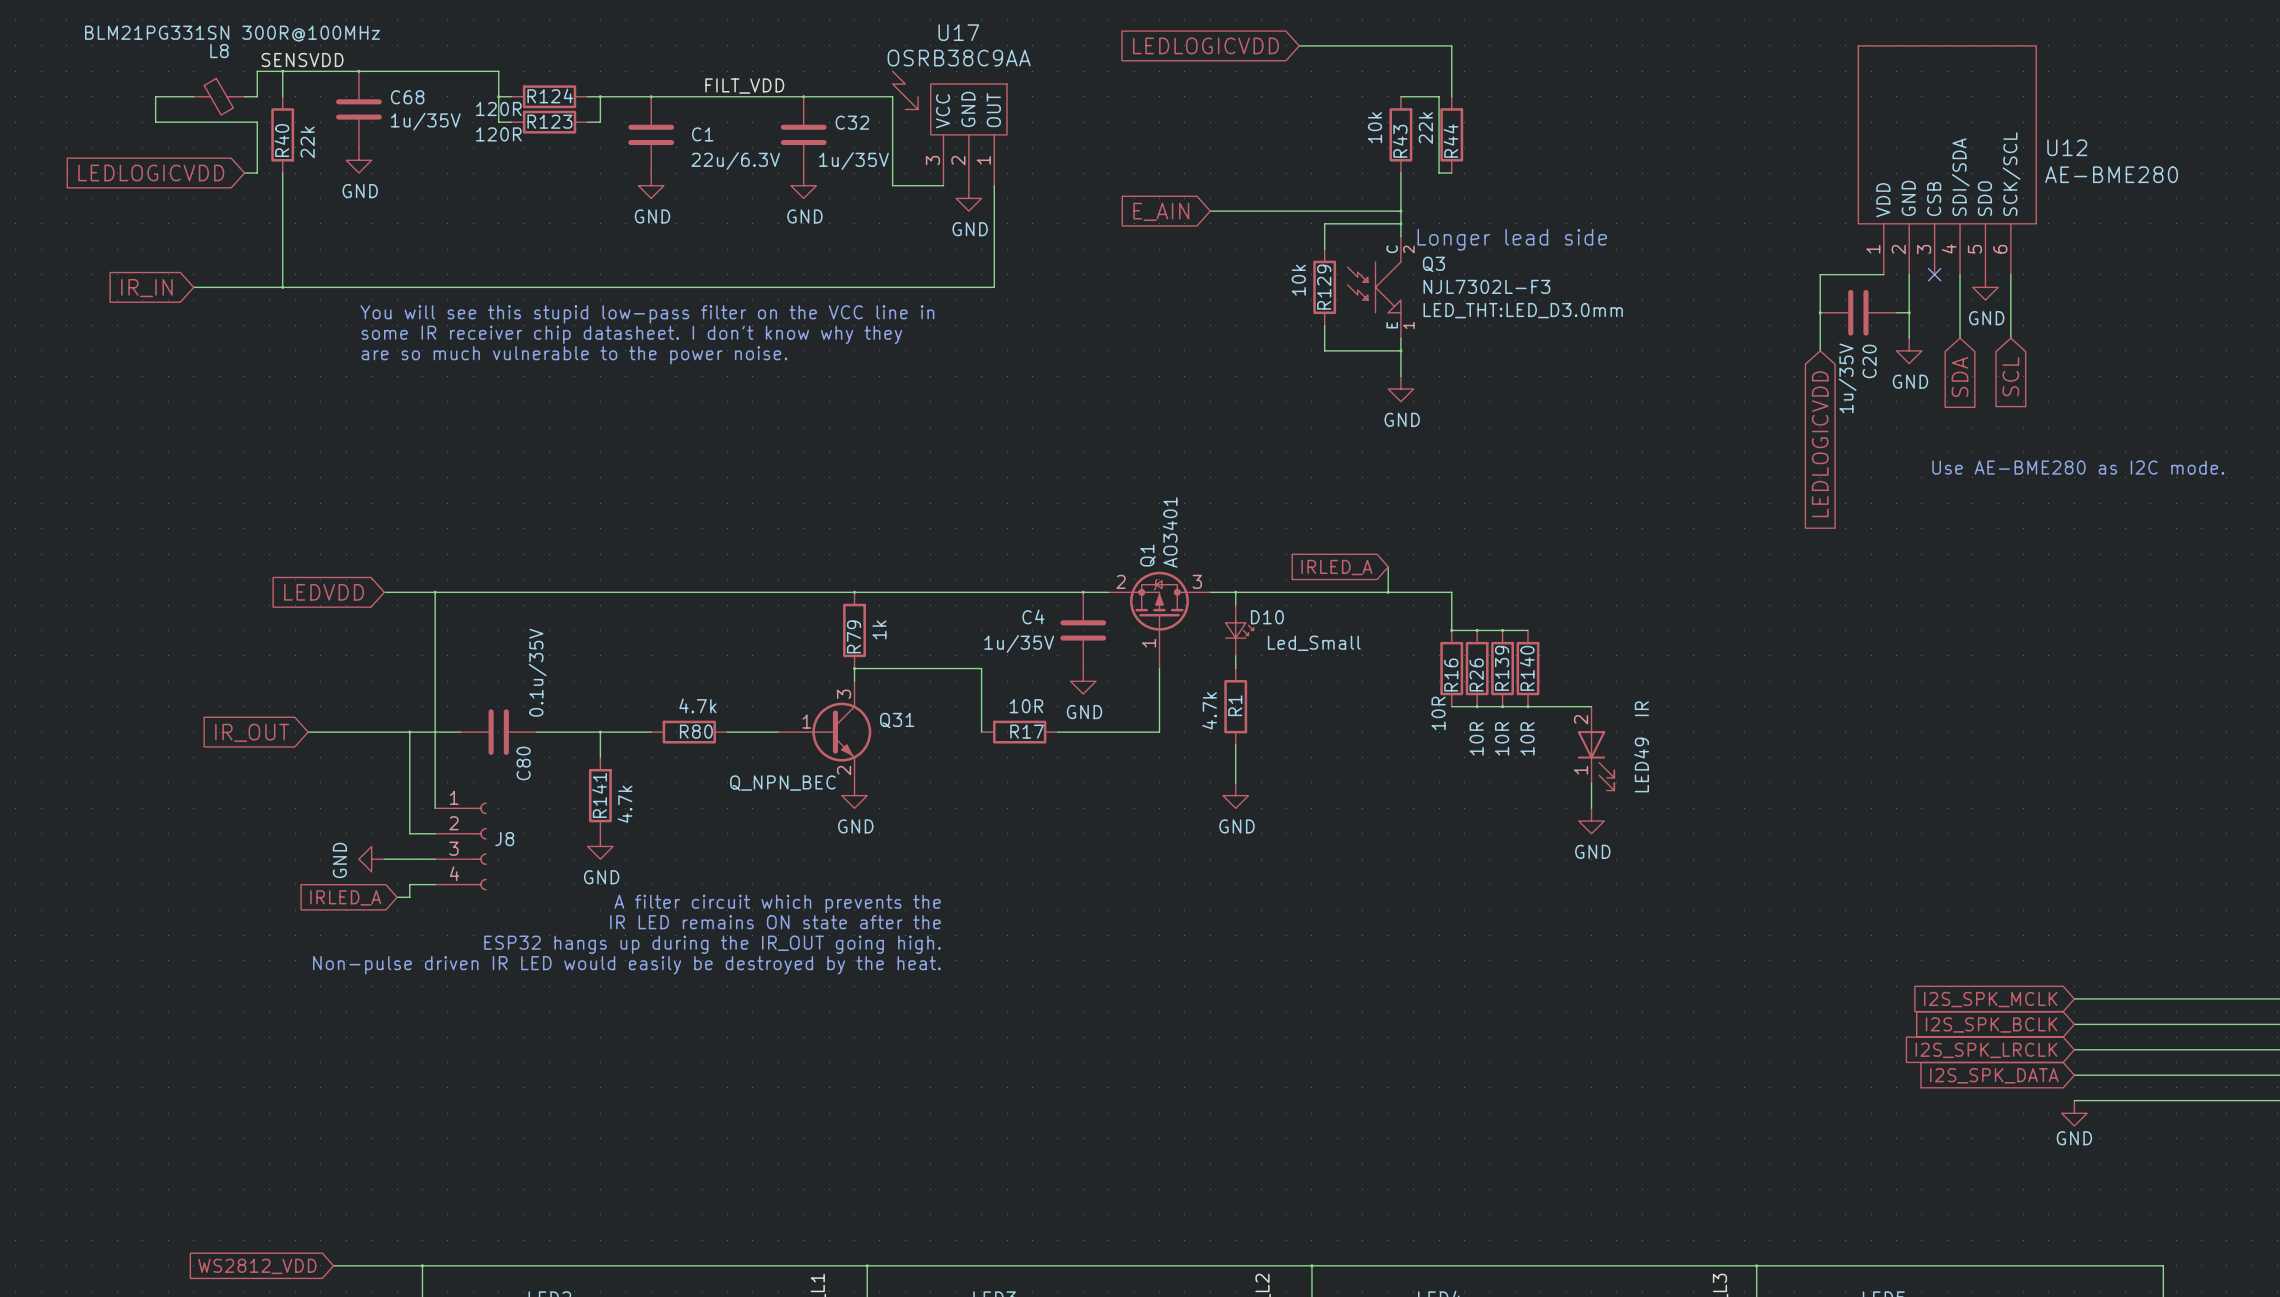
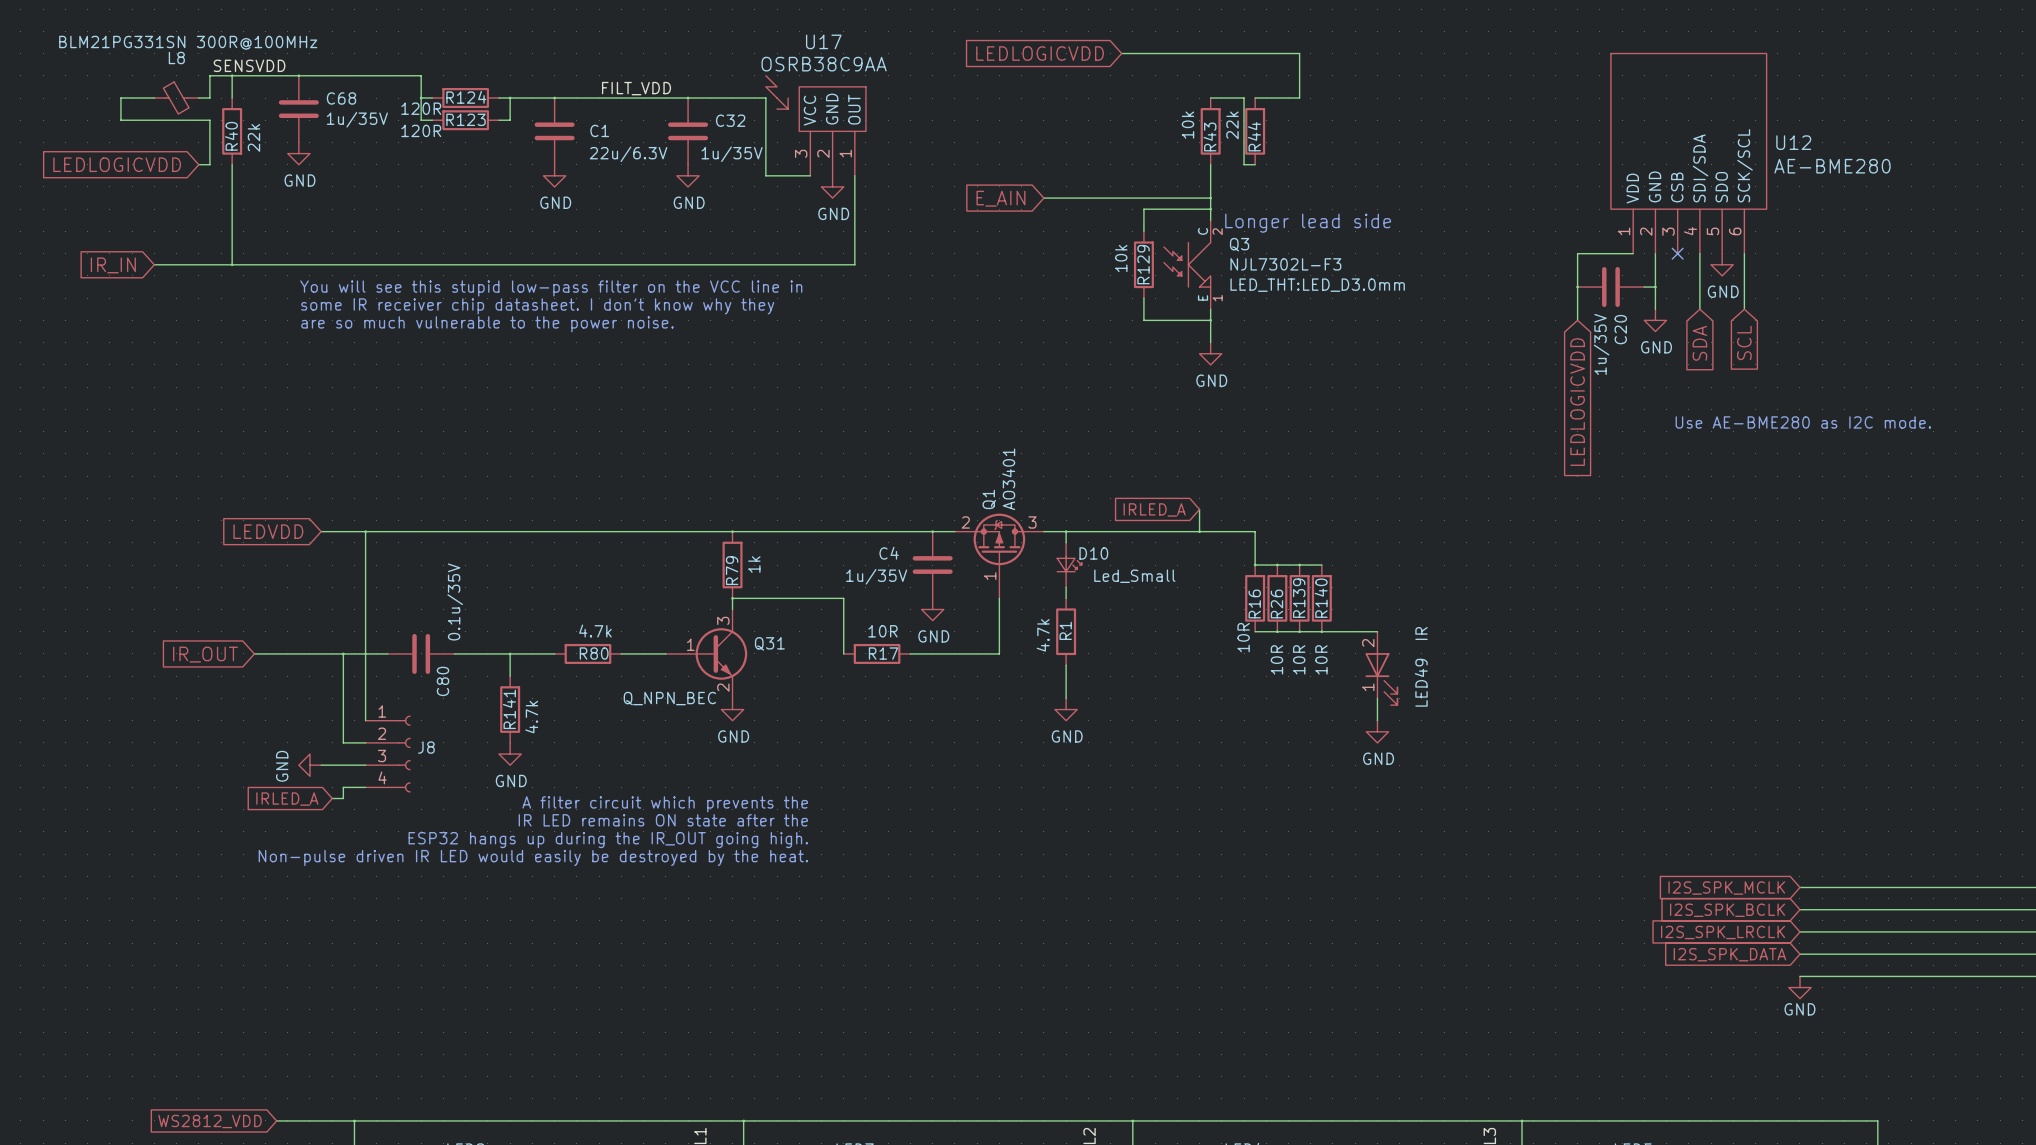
wire: (1451, 45) (1451, 96) -> (1255, 53) (1299, 53) (1299, 98) (1255, 98)

